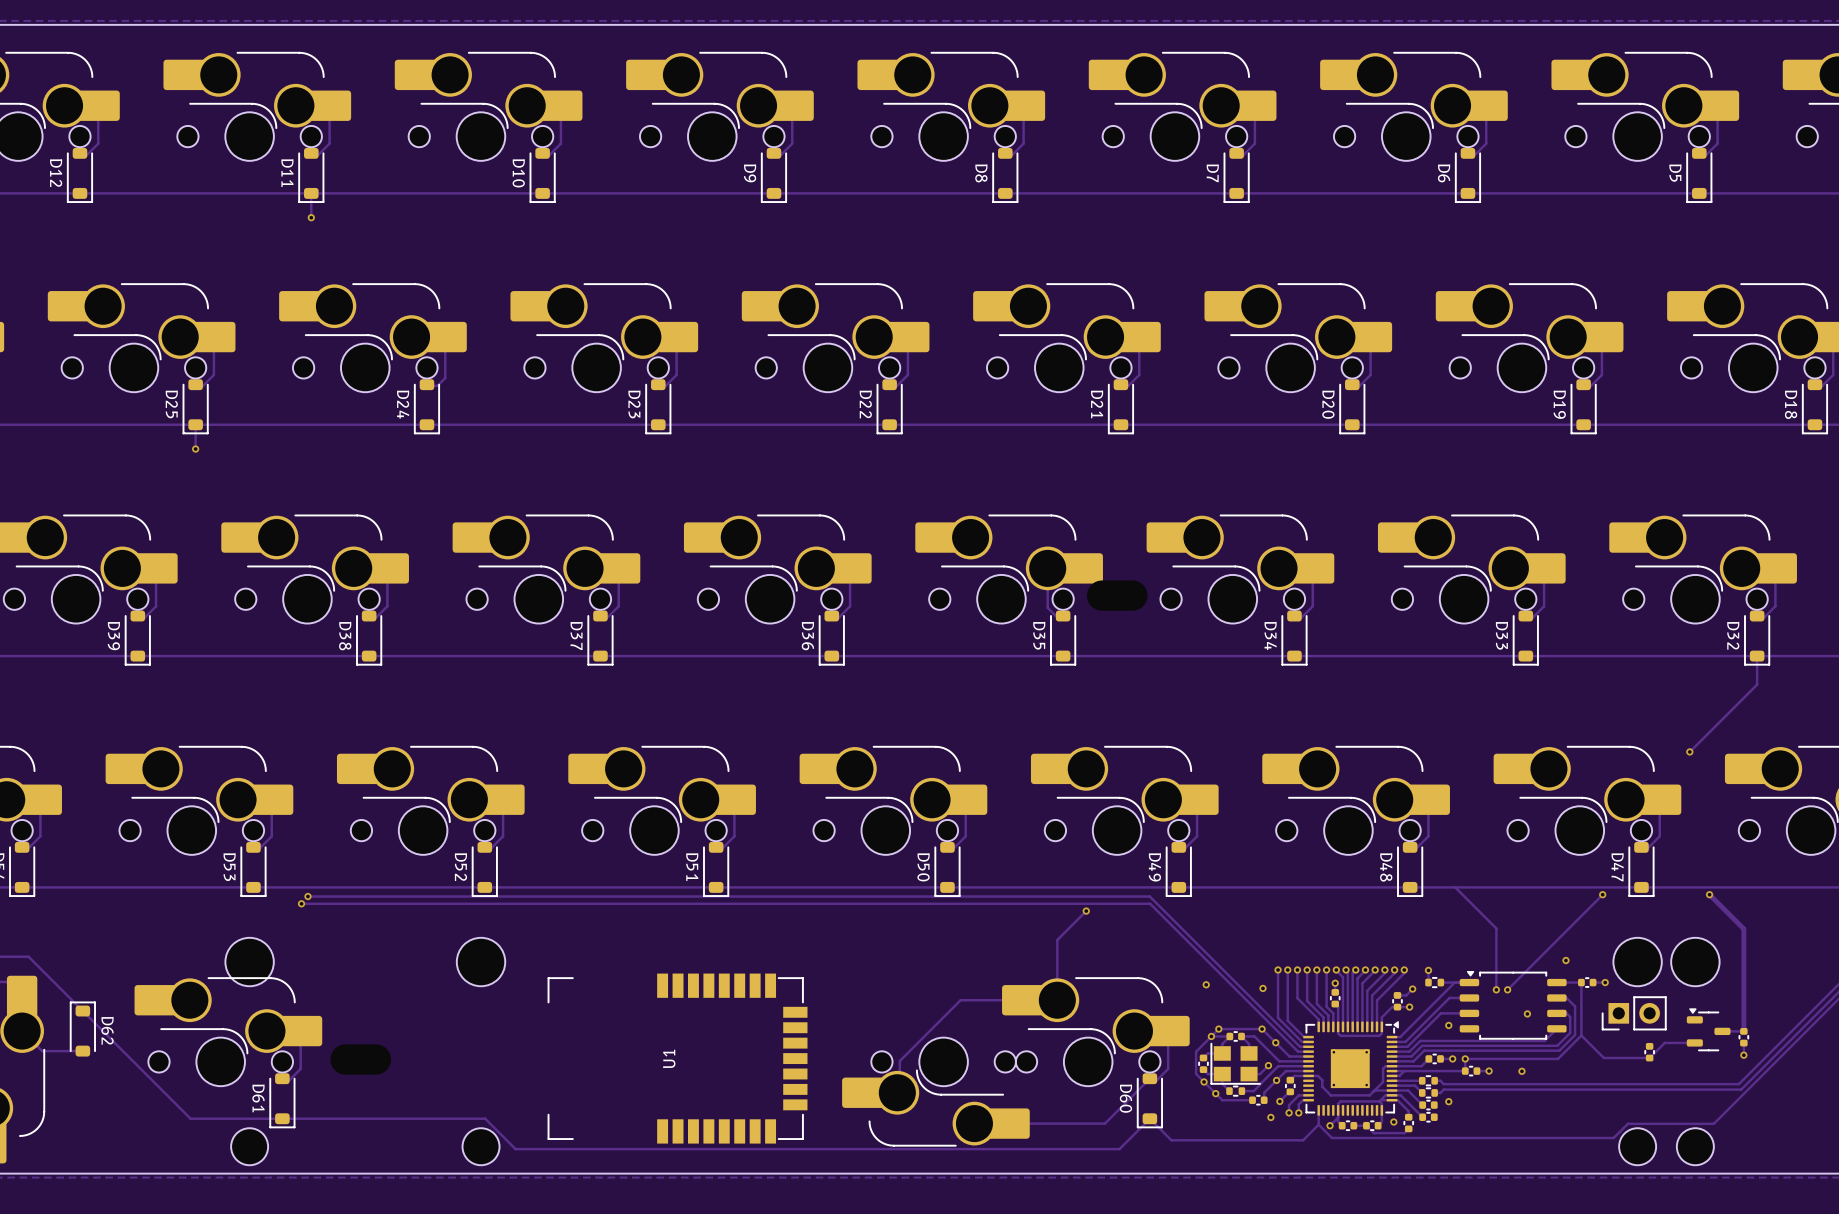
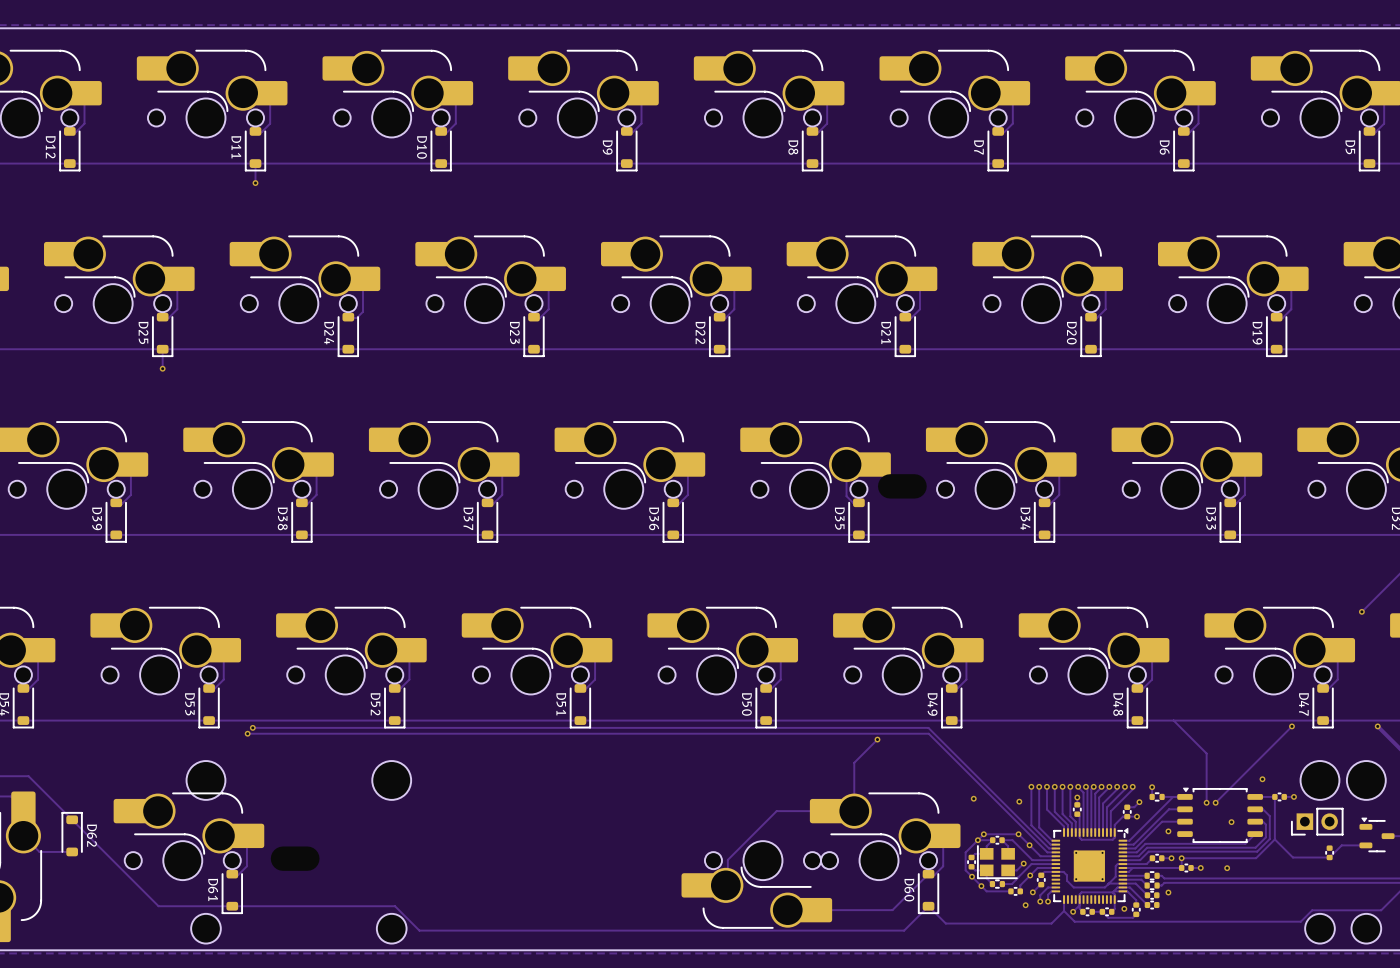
U1: (677, 1058) -> none

